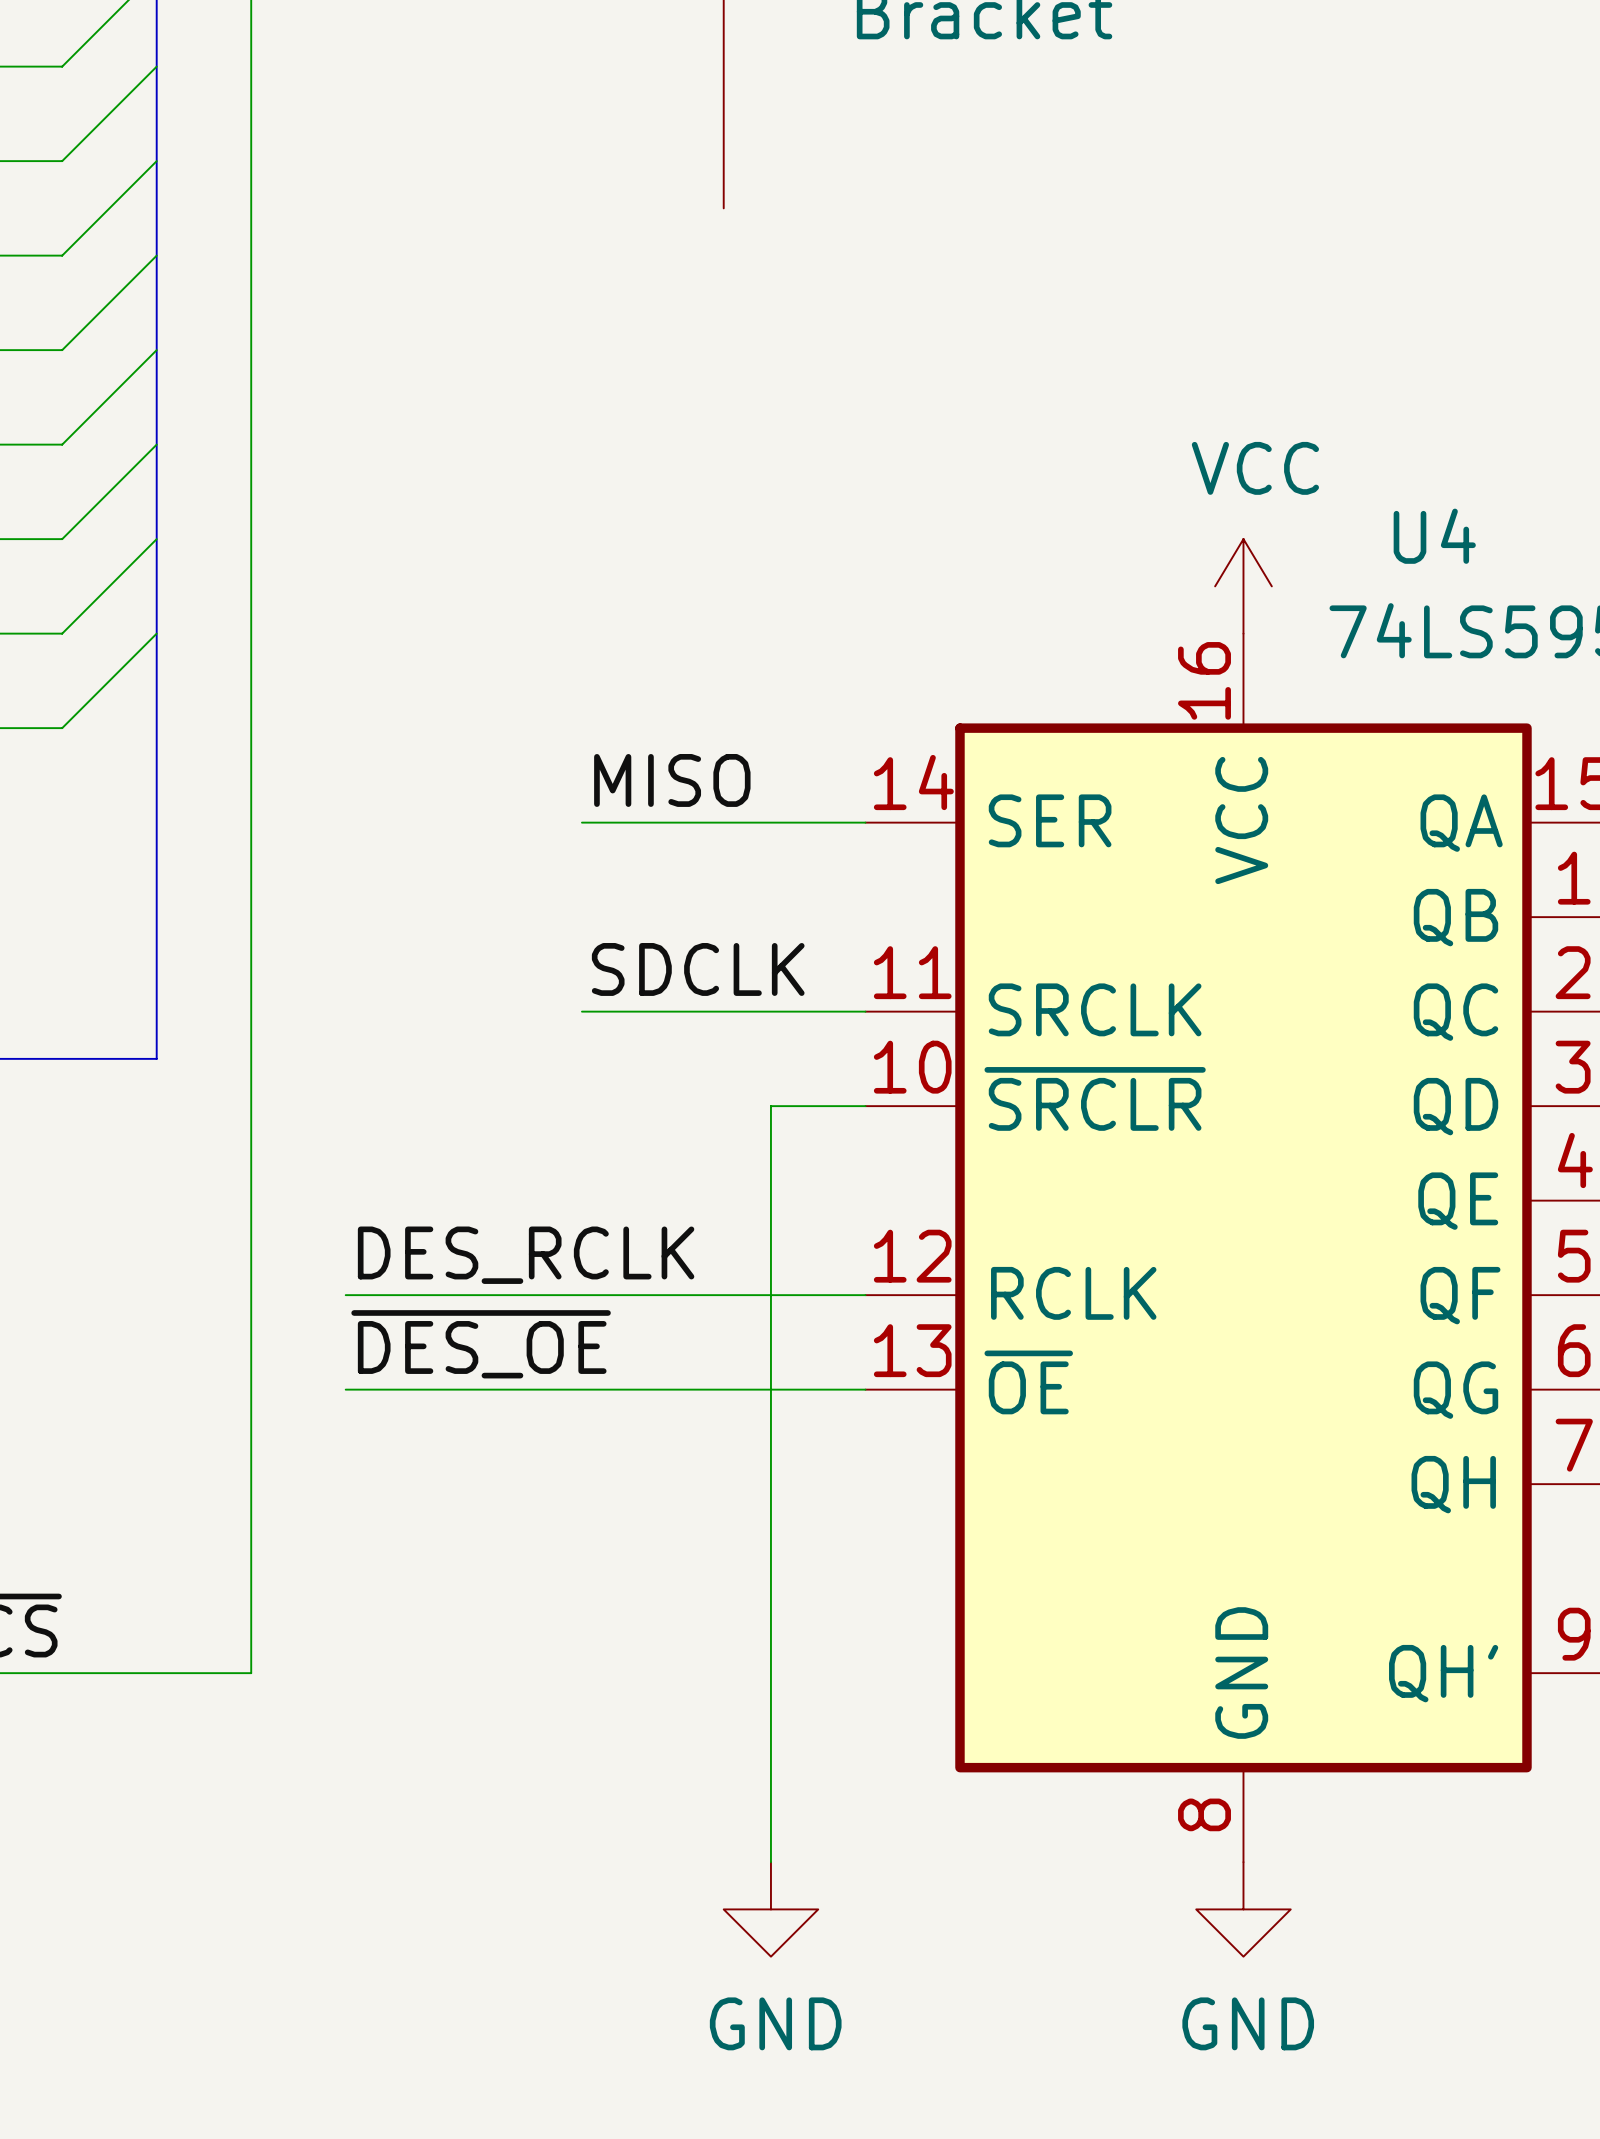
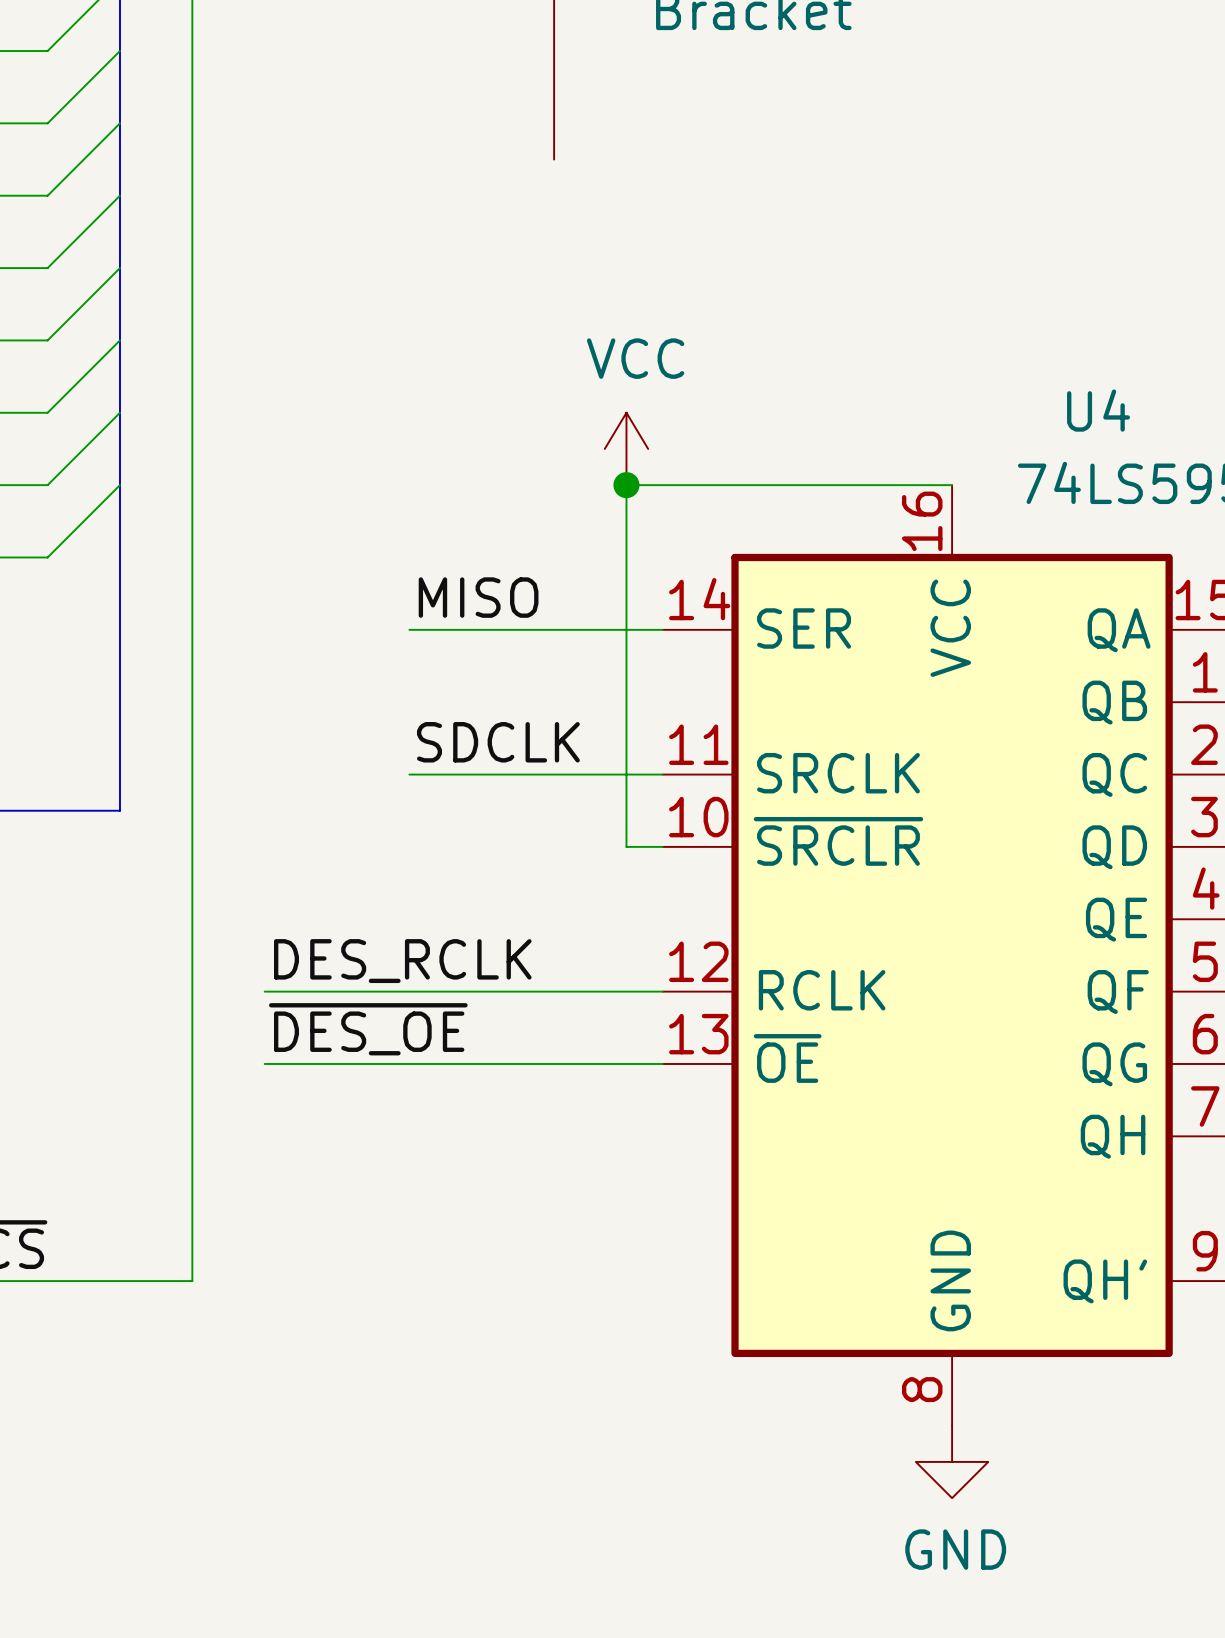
power symbol position: VCC (1243, 586) -> VCC (626, 448)
junction: none -> (626, 485)
label position: MISO (672, 780) -> MISO (478, 597)
wire: none -> (409, 629) (445, 629)
label position: SDCLK (698, 969) -> SDCLK (498, 742)
wire: none -> (409, 774) (445, 774)
wire: (818, 1106) (770, 1106) (770, 1862) -> (626, 846) (626, 485) (952, 485)
power symbol: GND (770, 1909) -> none

